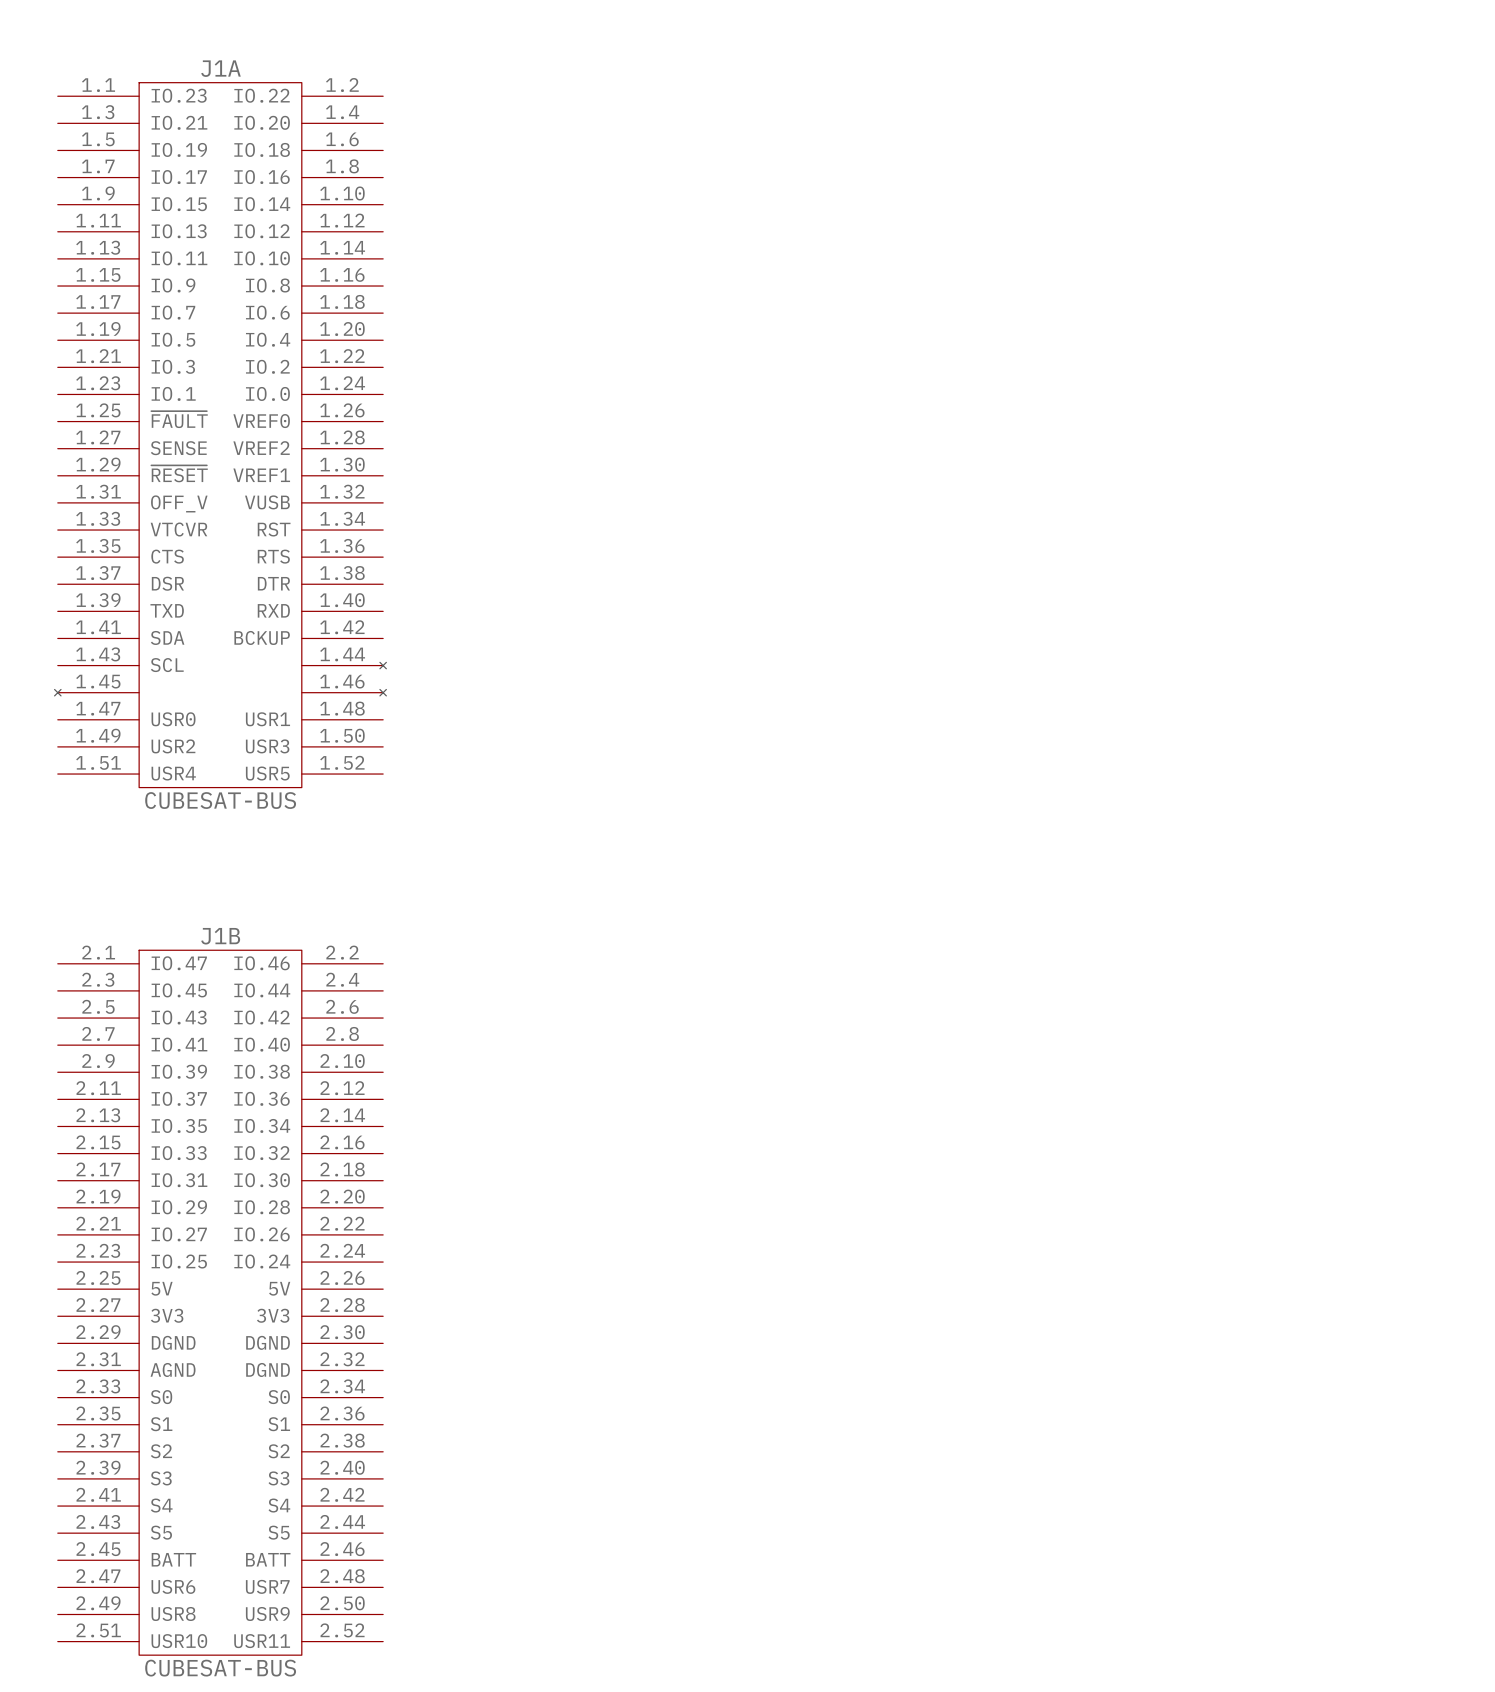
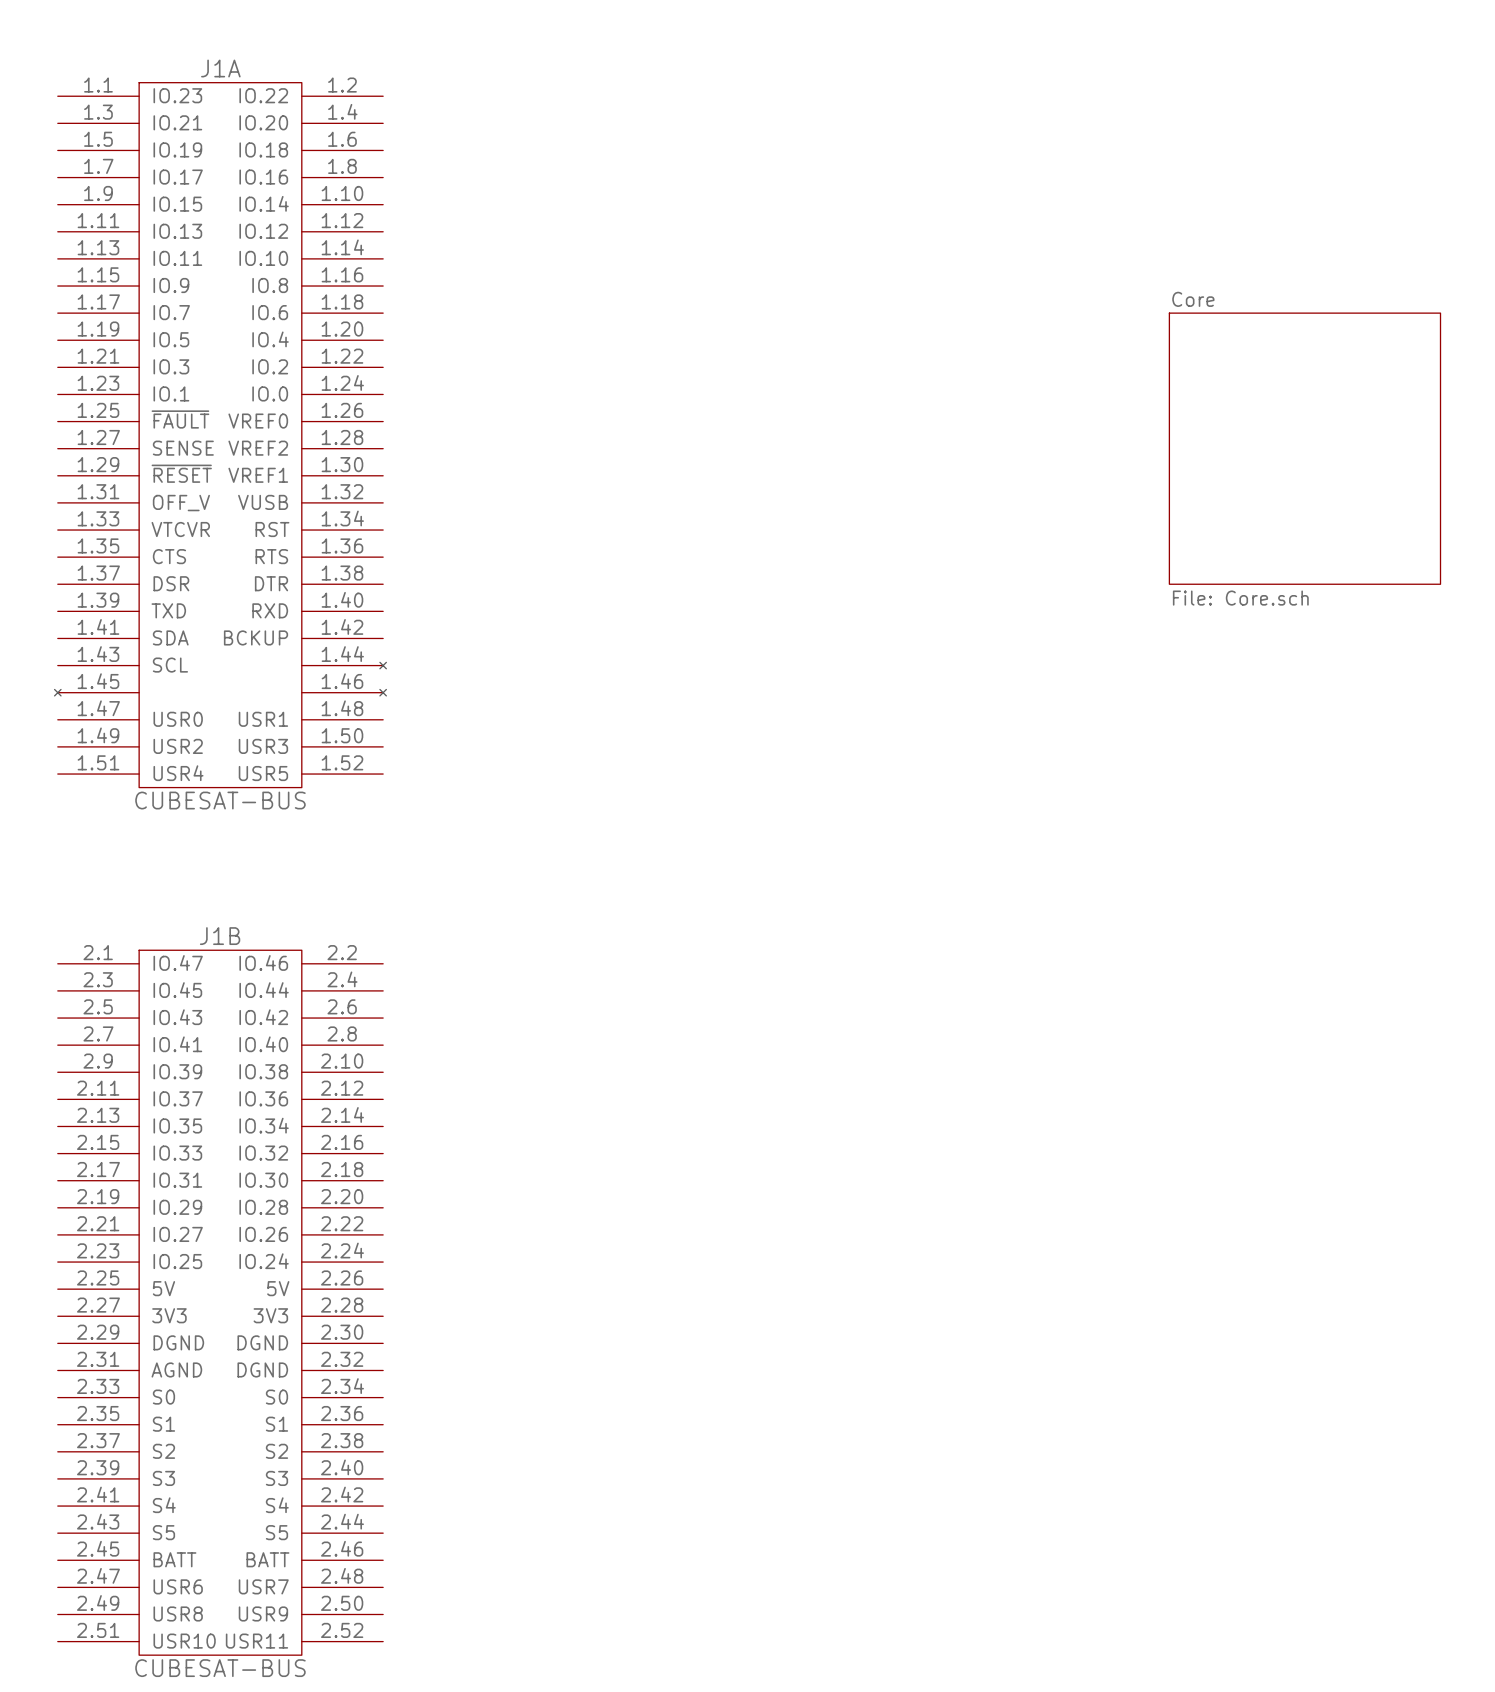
sheet Core: none -> File: Core.sch (1304, 448)

